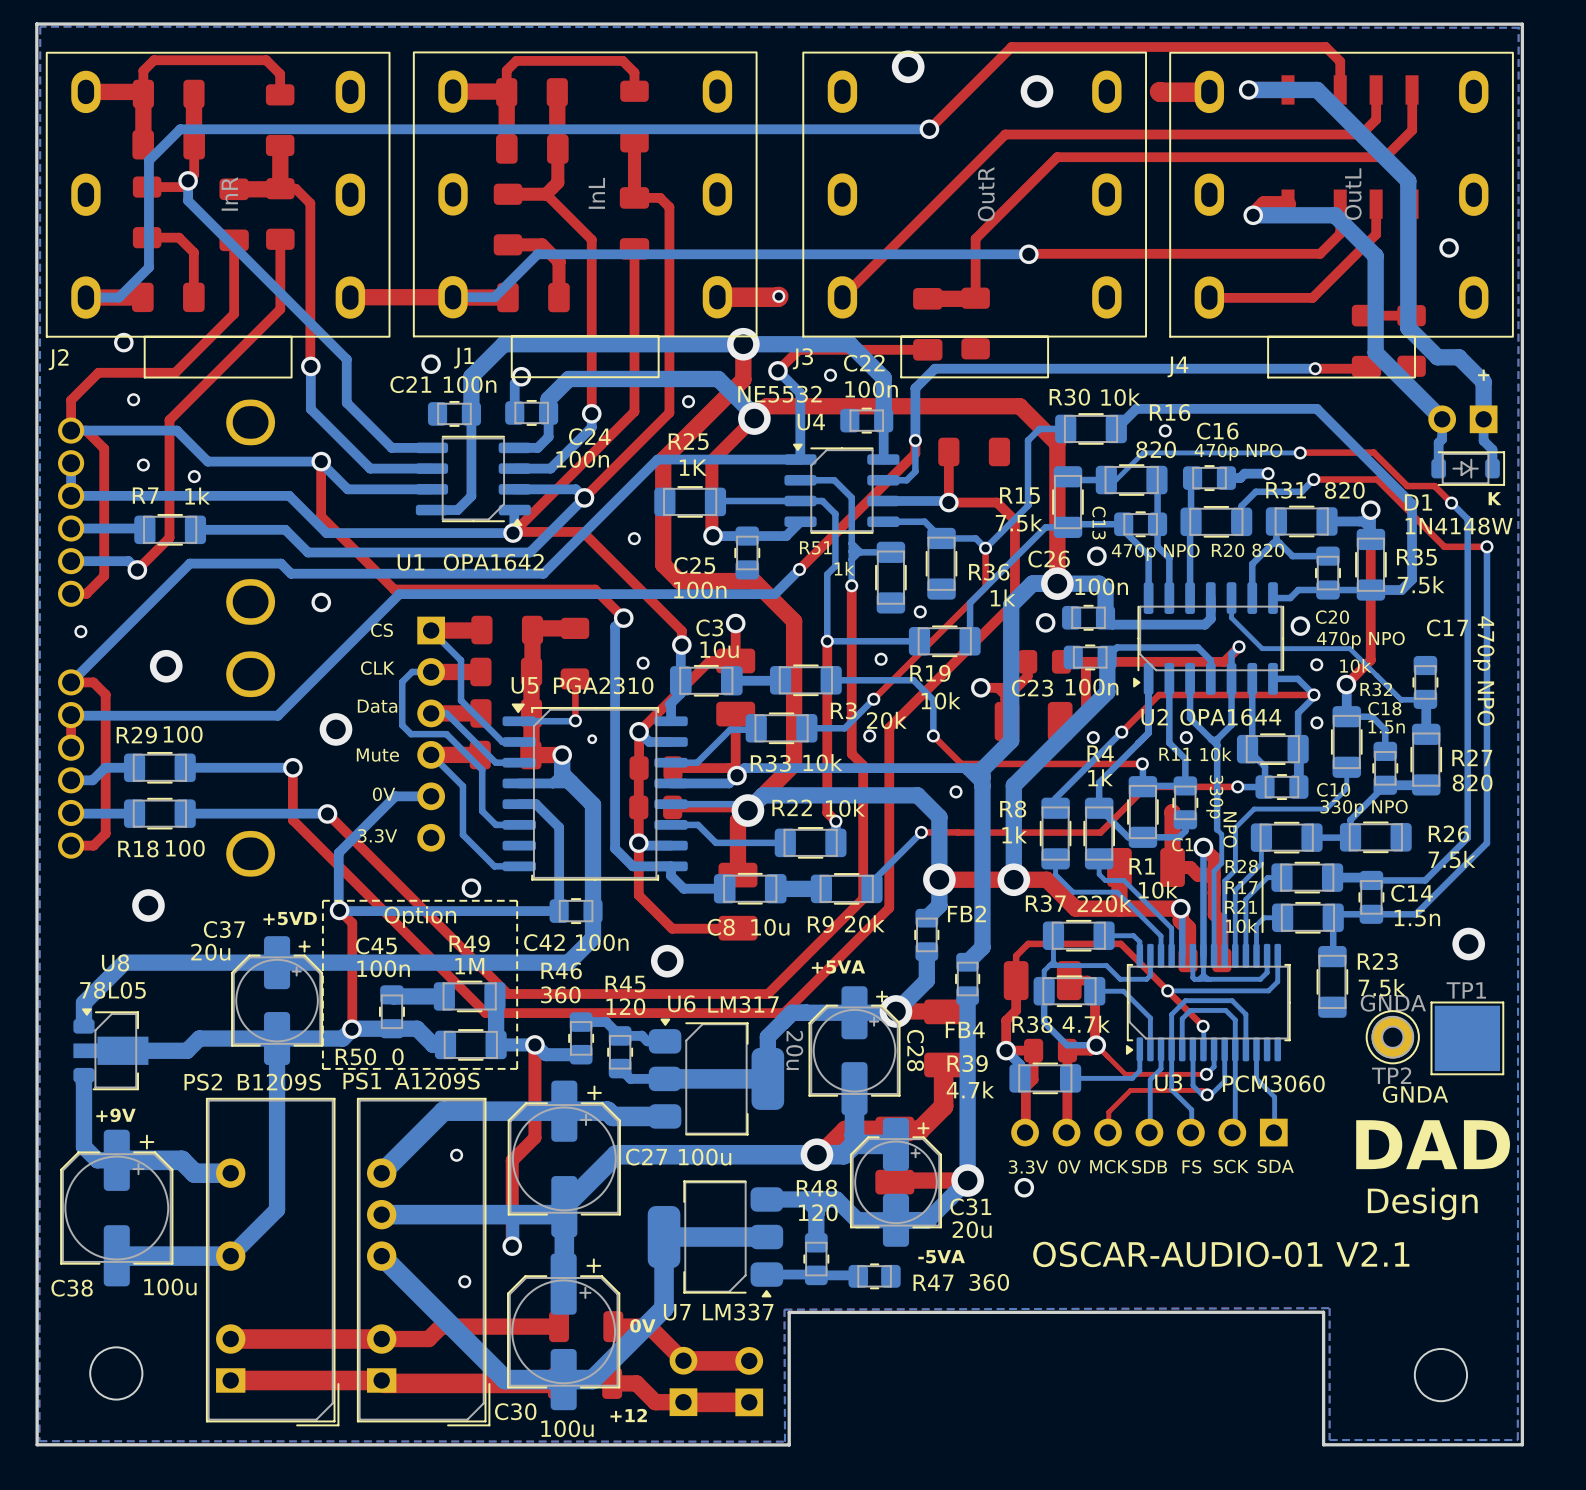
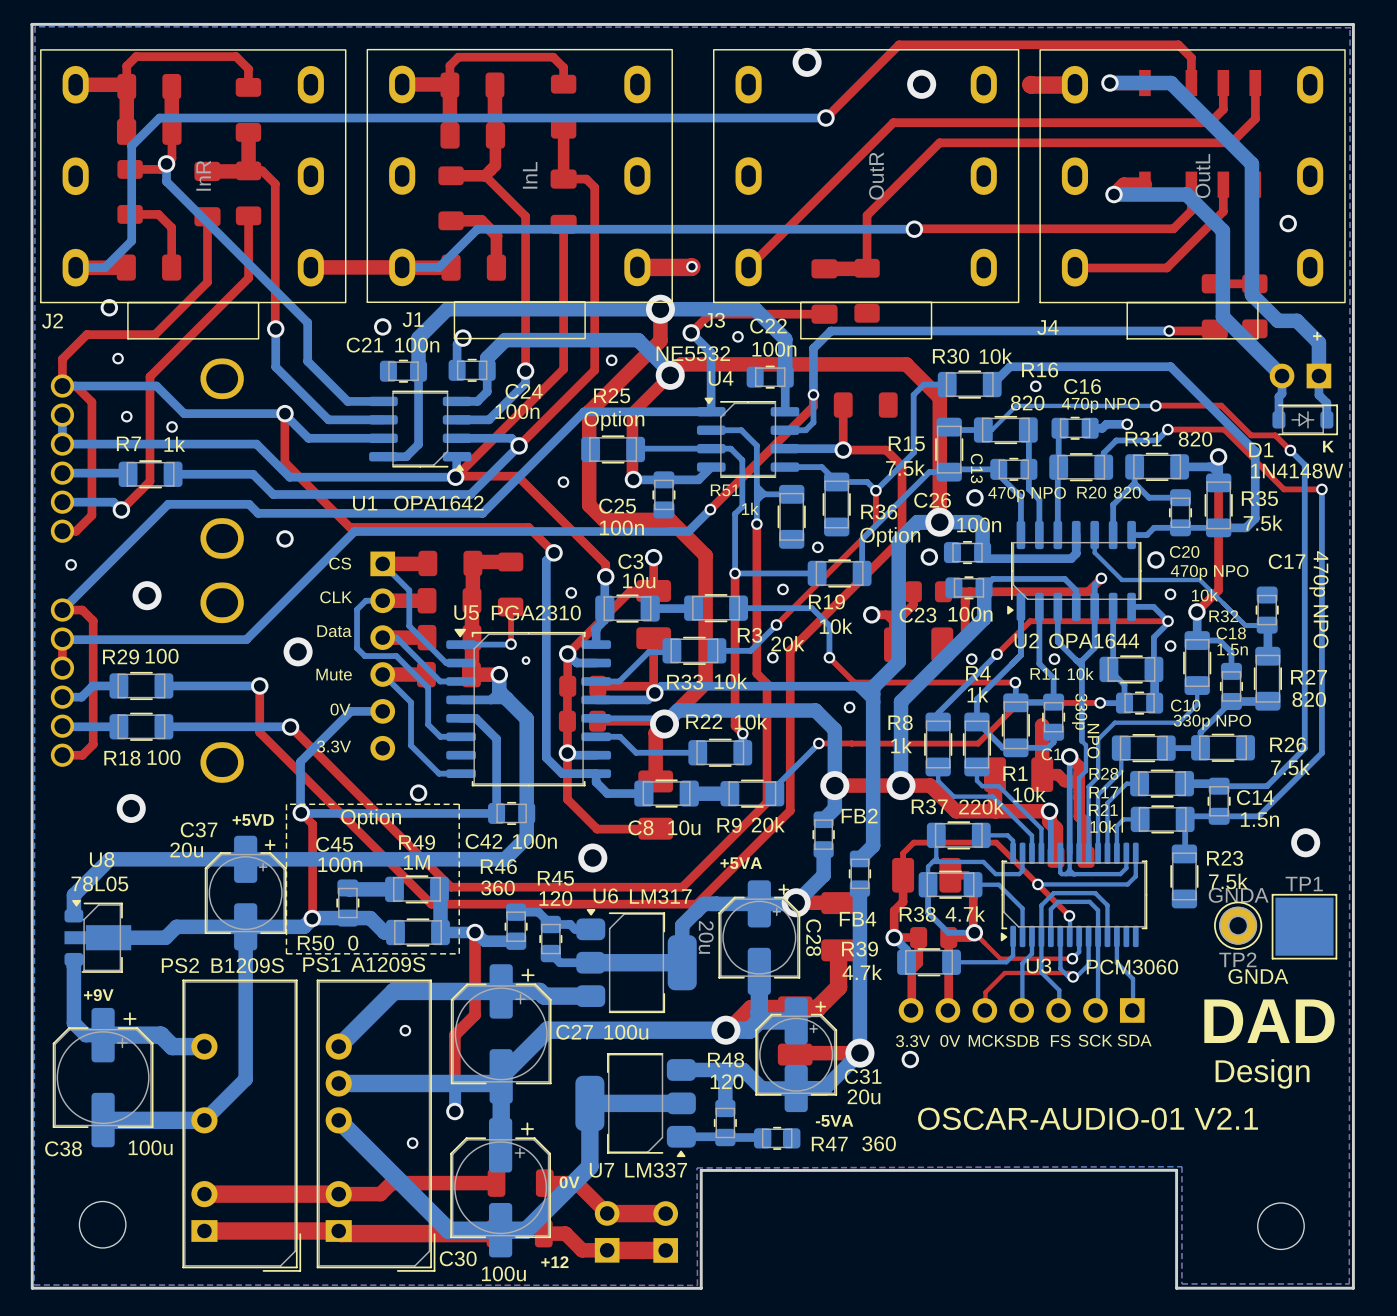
R25 value: 1K (693, 467) -> Option (614, 420)
R36 value: 1k (1003, 597) -> Option (890, 536)

